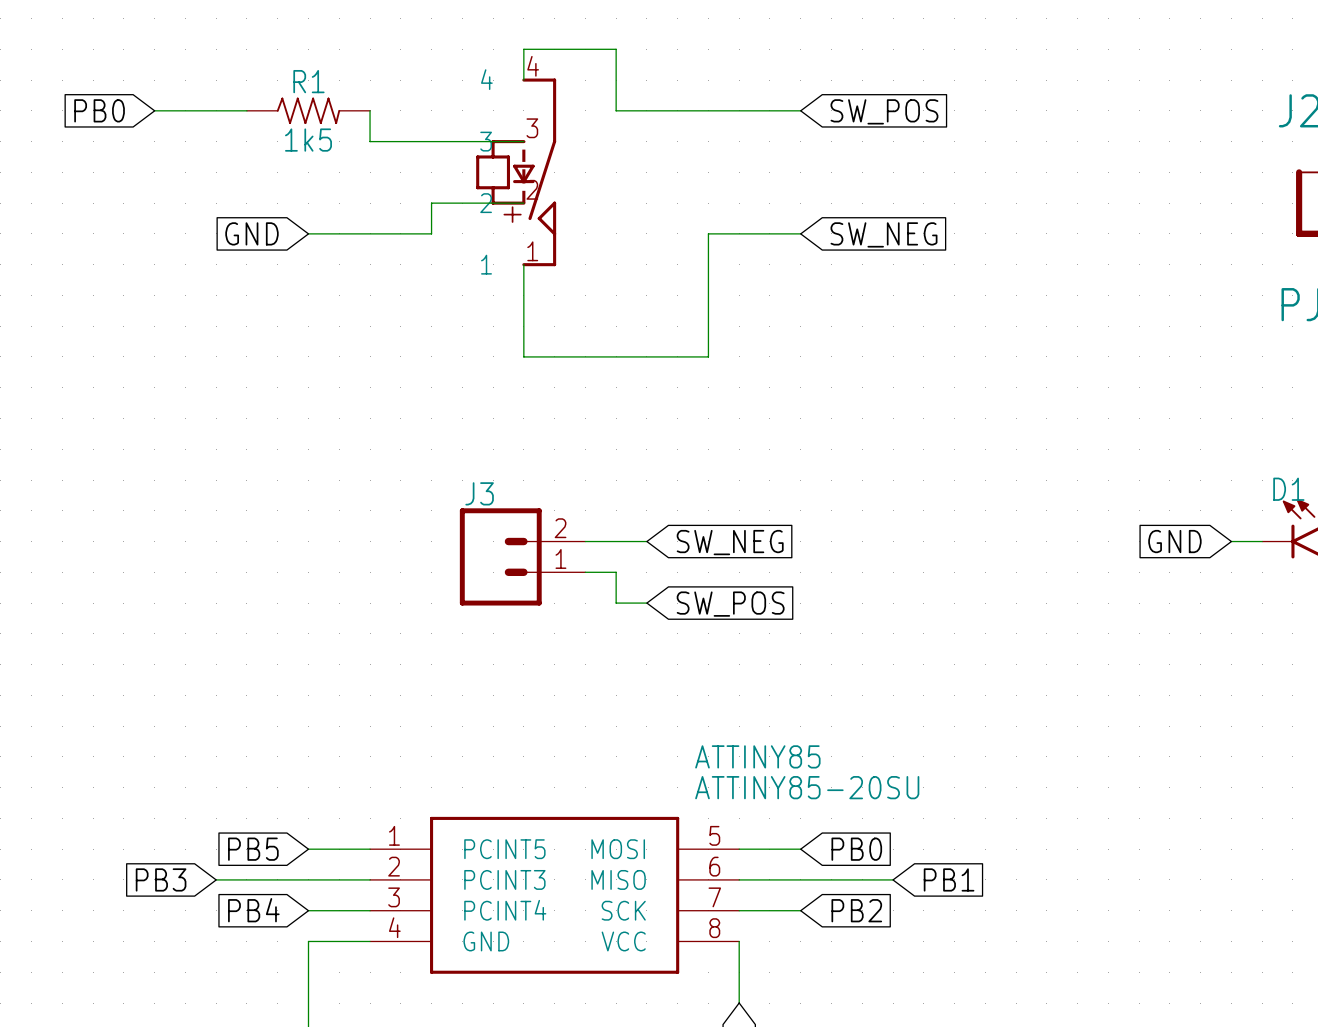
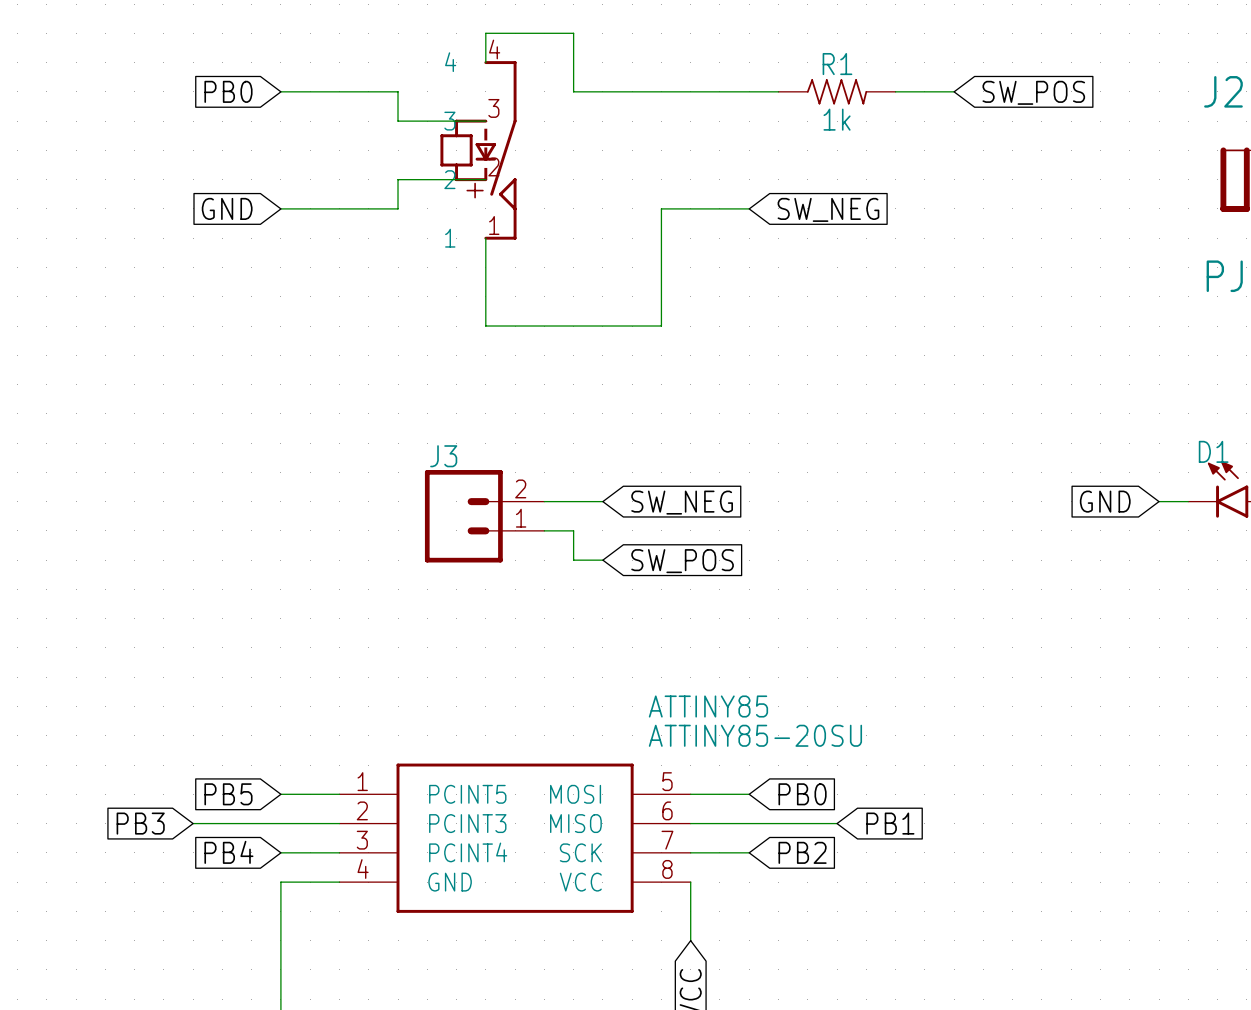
global label position: PB0 (99, 110) -> PB0 (228, 91)
wire: (154, 110) (246, 110) -> none
R1 position: (308, 110) -> (837, 91)
wire: (370, 110) (370, 141) (431, 141) -> (280, 91) (398, 91) (398, 121)
wire: none -> (749, 91) (778, 91)
wire: none -> (895, 91) (954, 91)
global label position: SW_POS (884, 111) -> SW_POS (1033, 92)
R1 value: 1k5 (308, 140) -> 1k (837, 119)

